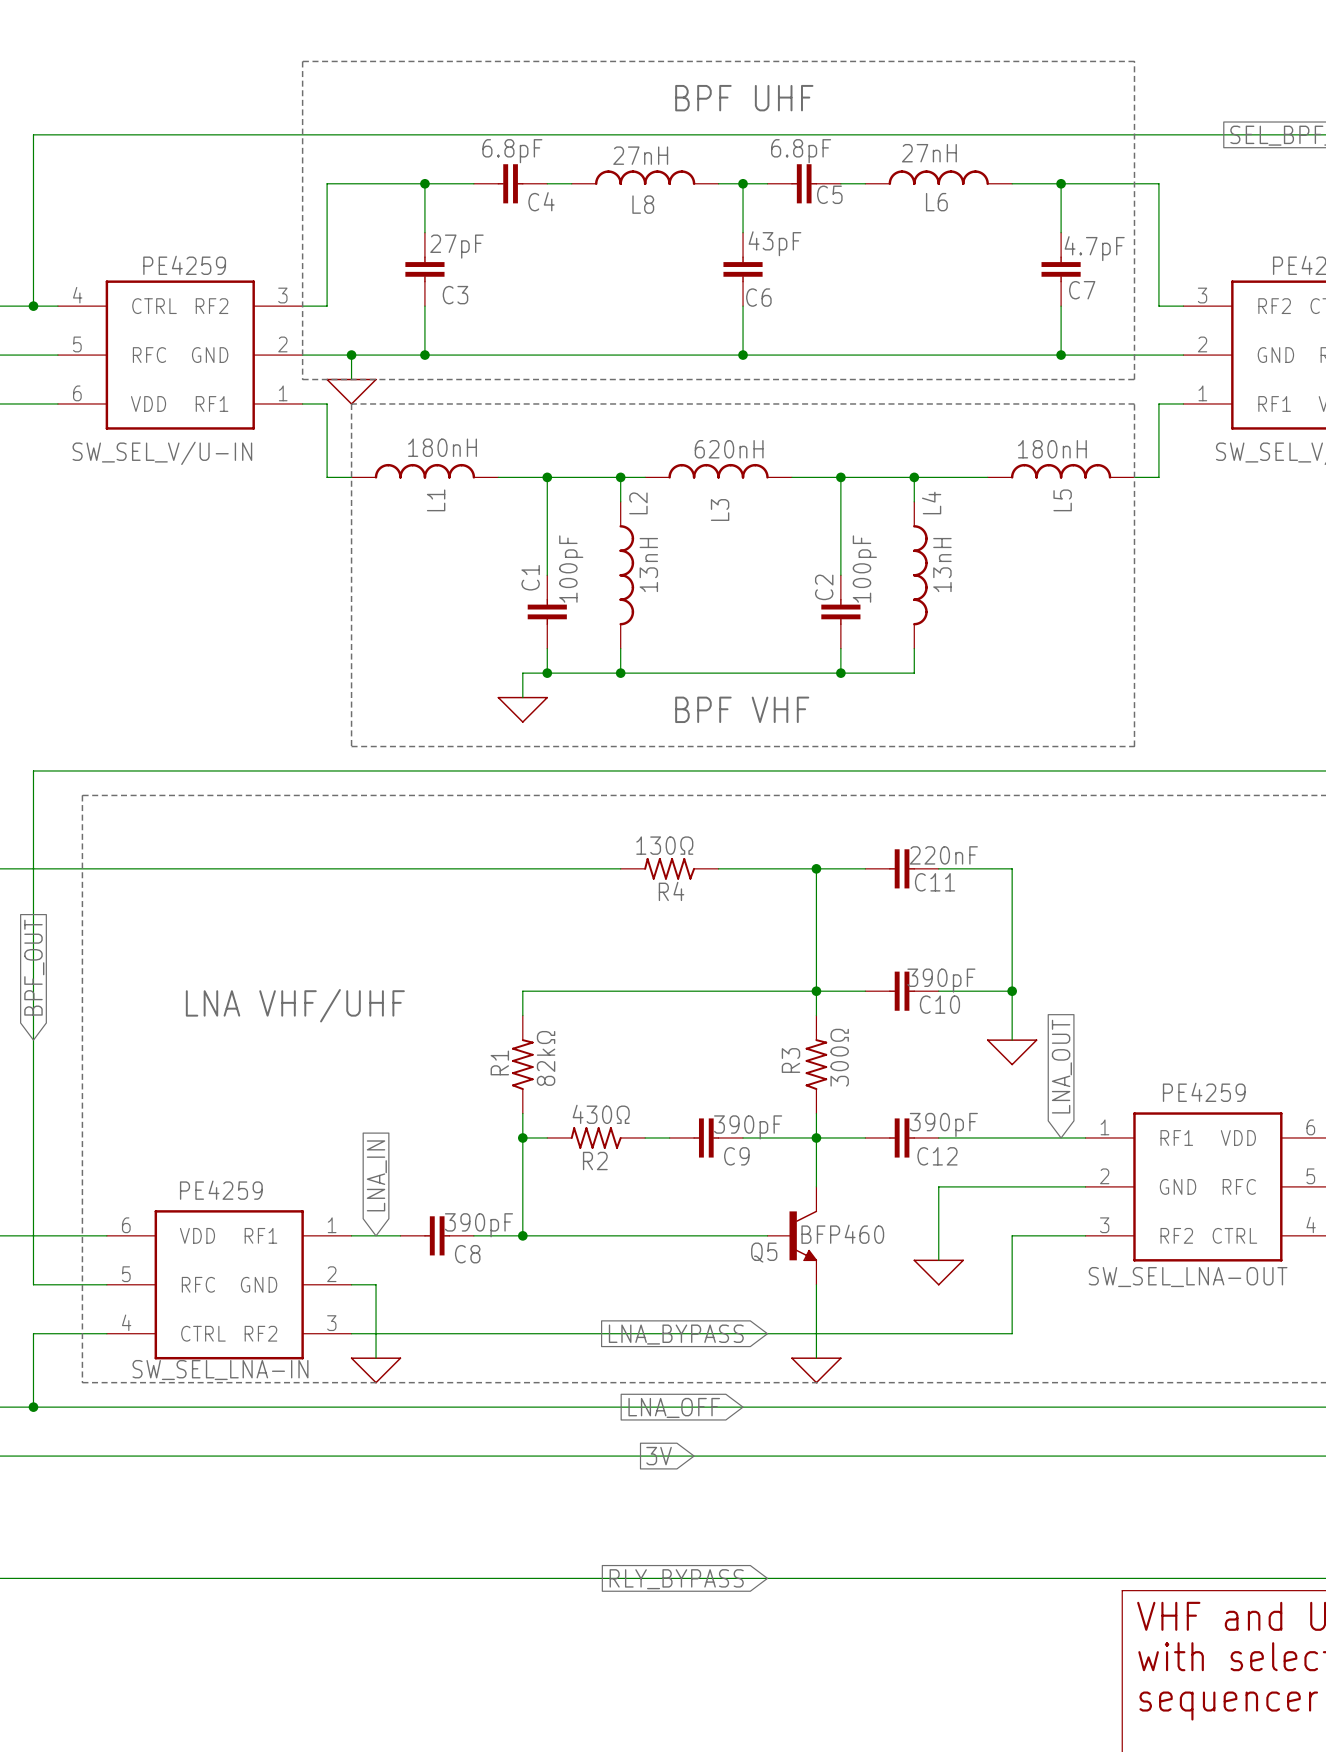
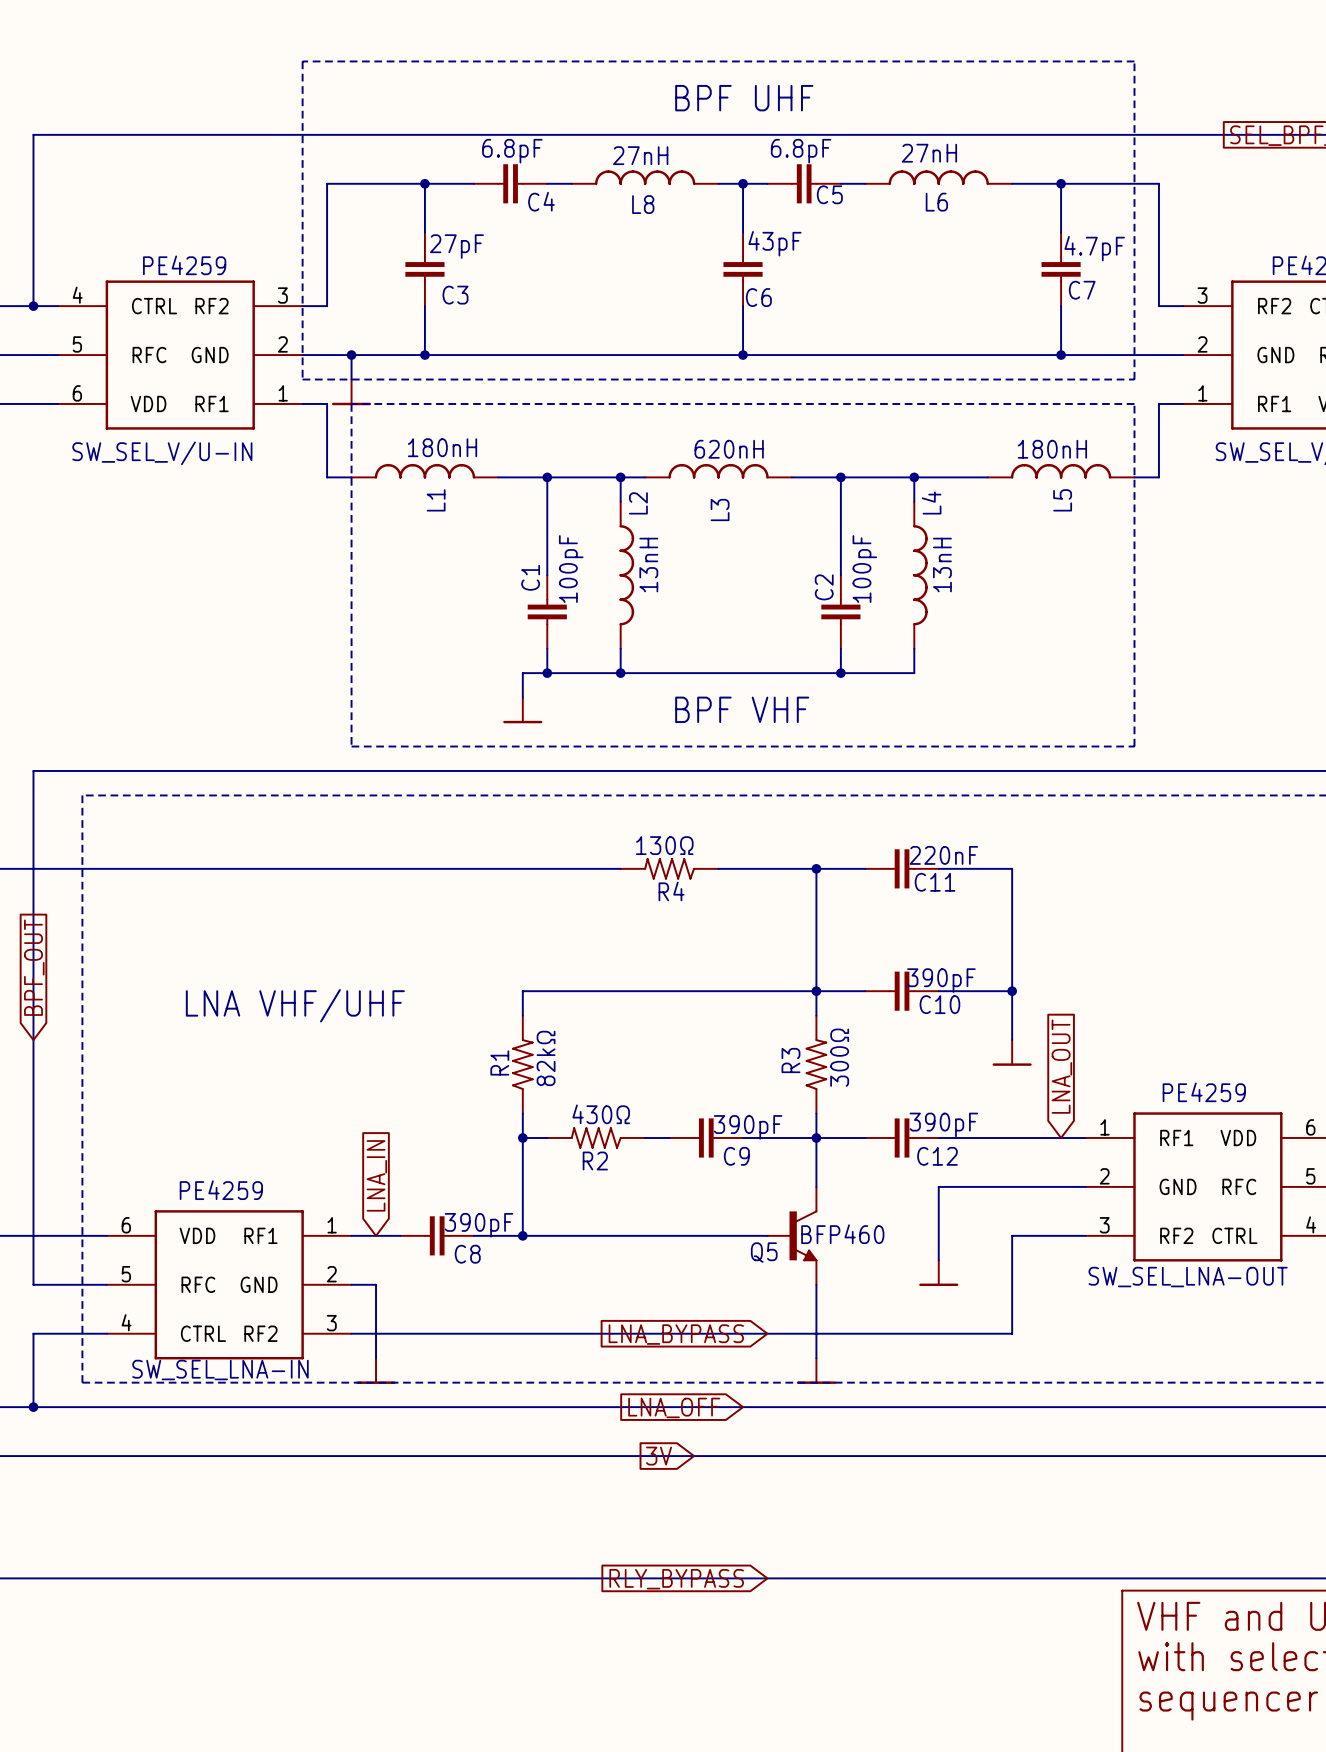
power symbol shape: [326, 378, 377, 405] -> [331, 379, 372, 406]
power symbol shape: [497, 696, 549, 723] -> [503, 697, 543, 724]
power symbol shape: [986, 1039, 1038, 1066] -> [992, 1040, 1032, 1066]
power symbol shape: [913, 1259, 964, 1286] -> [919, 1260, 959, 1287]
power symbol shape: [350, 1357, 402, 1384] -> [356, 1358, 396, 1384]
power symbol shape: [791, 1357, 842, 1384] -> [796, 1358, 836, 1384]

